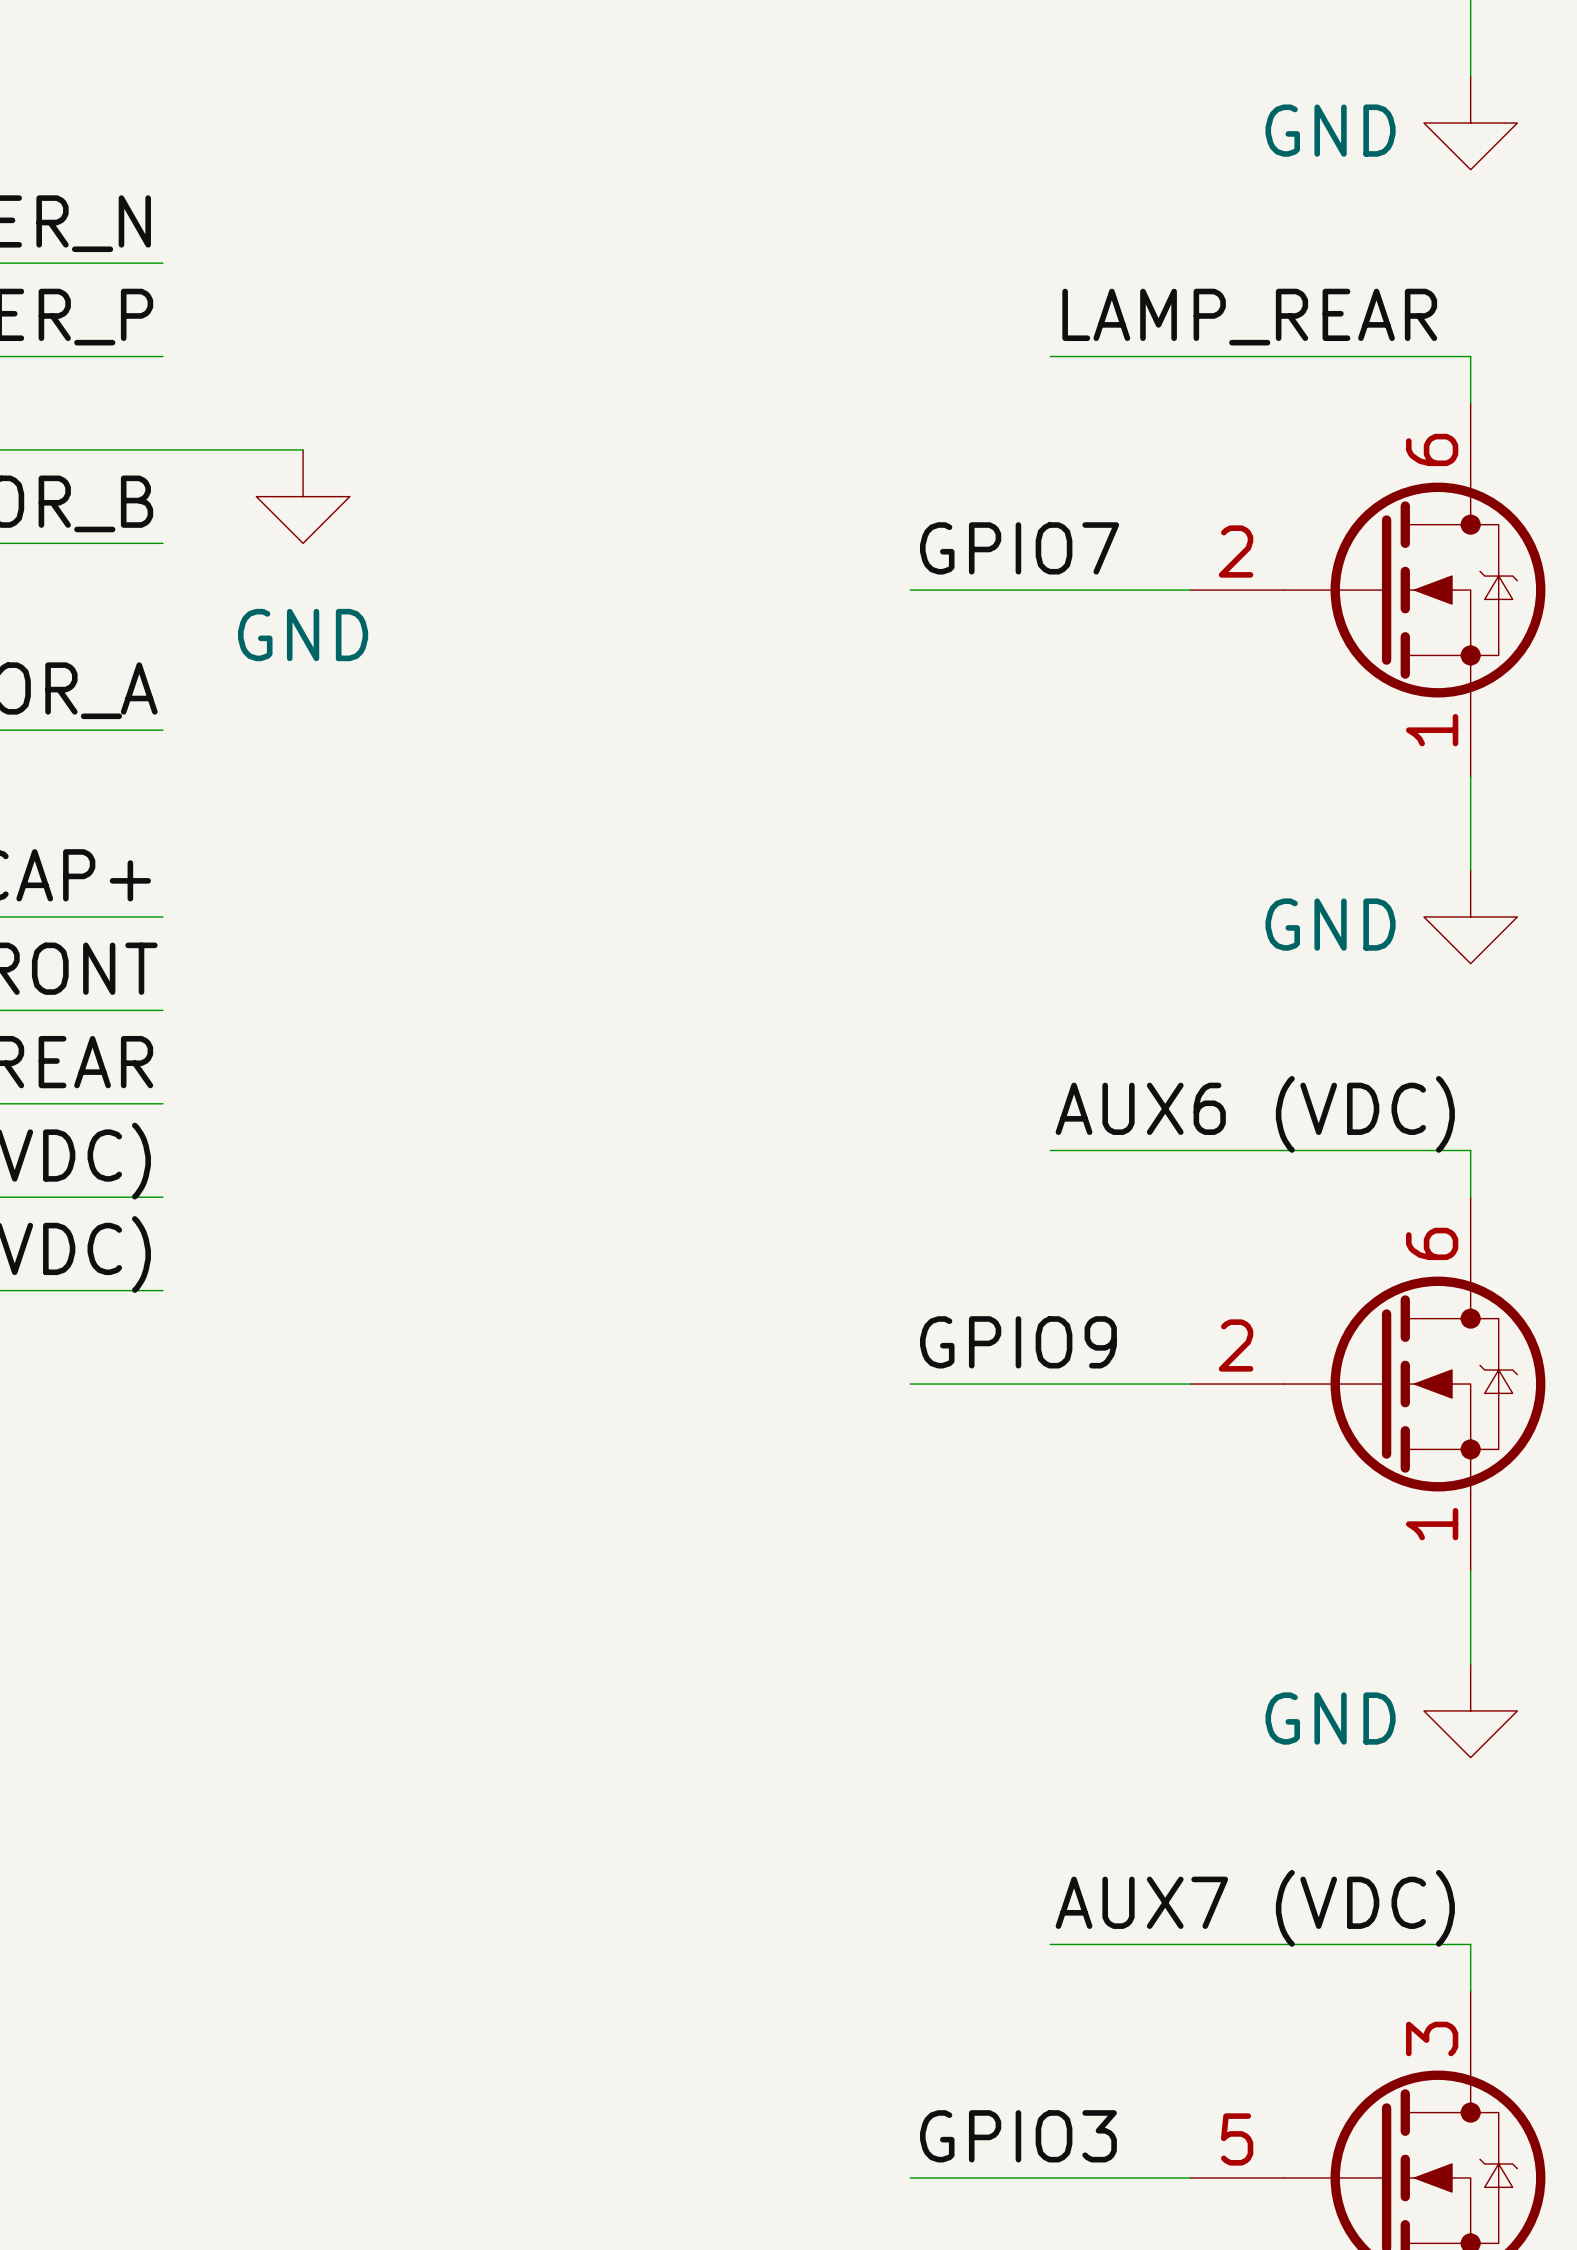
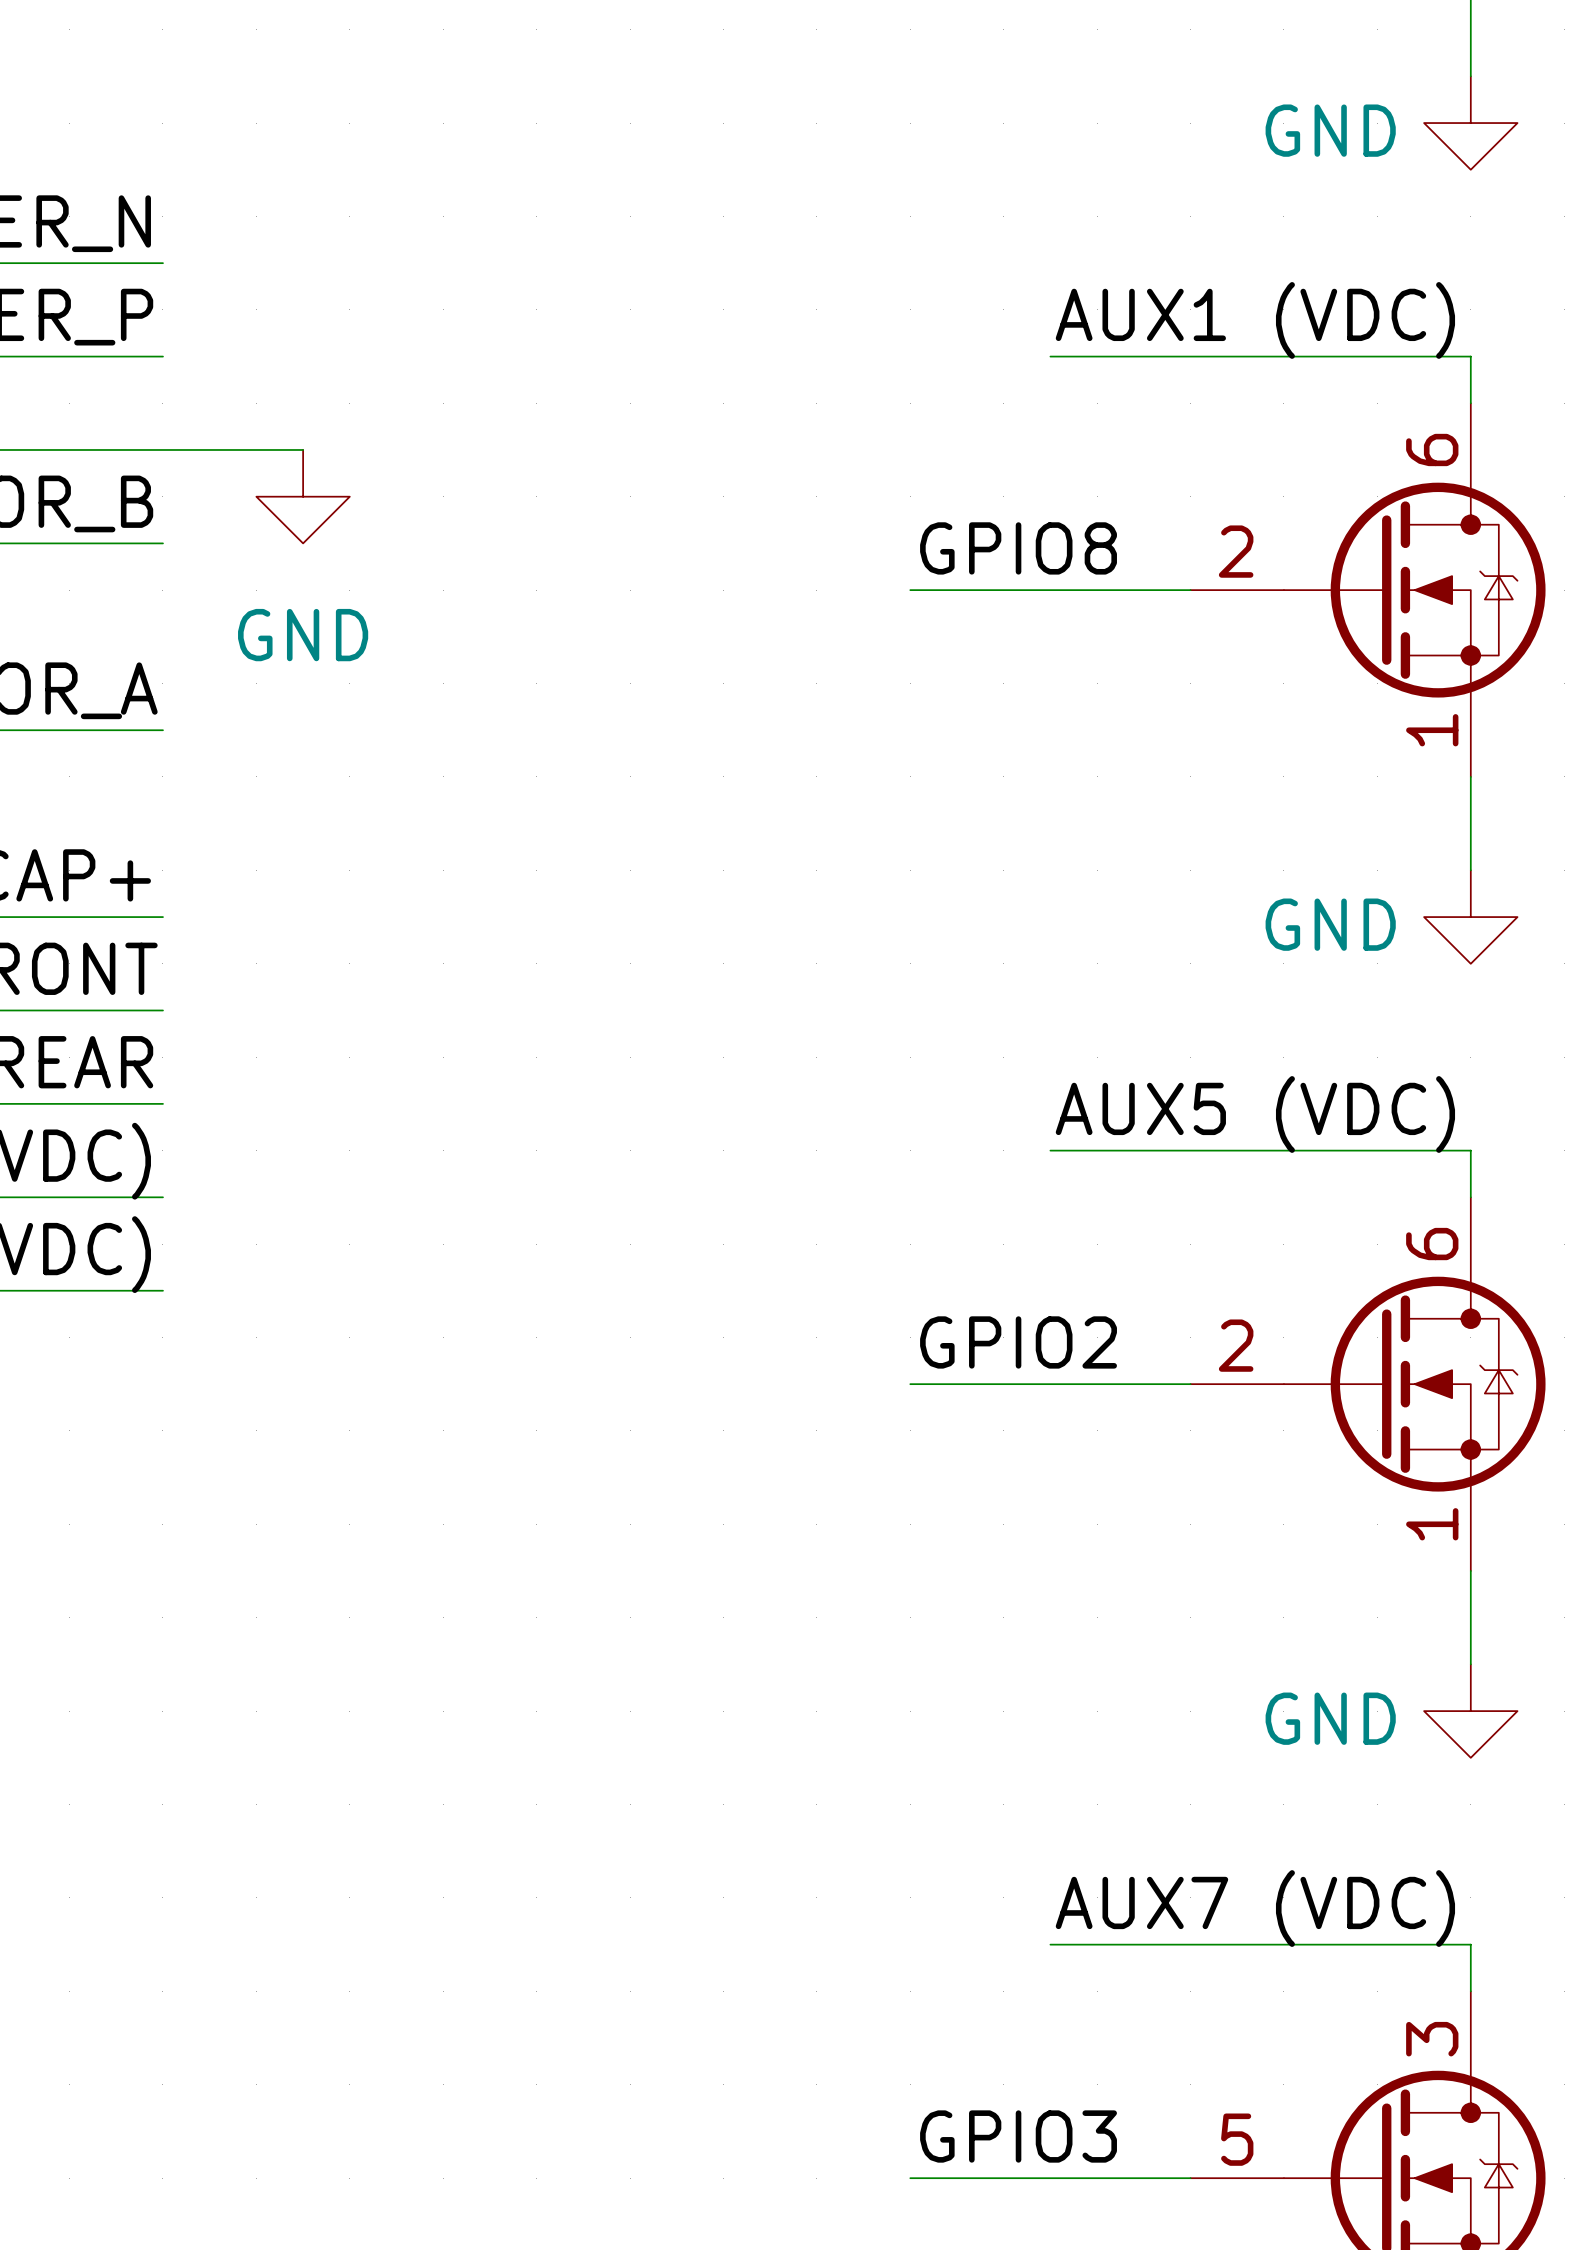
label: LAMP_REAR (1249, 317) -> AUX1 (VDC) (1255, 320)
label: GPIO7 (1019, 548) -> GPIO8 (1018, 548)
label: AUX6 (VDC) (1255, 1114) -> AUX5 (VDC) (1255, 1114)
label: GPIO9 (1018, 1342) -> GPIO2 (1018, 1342)

